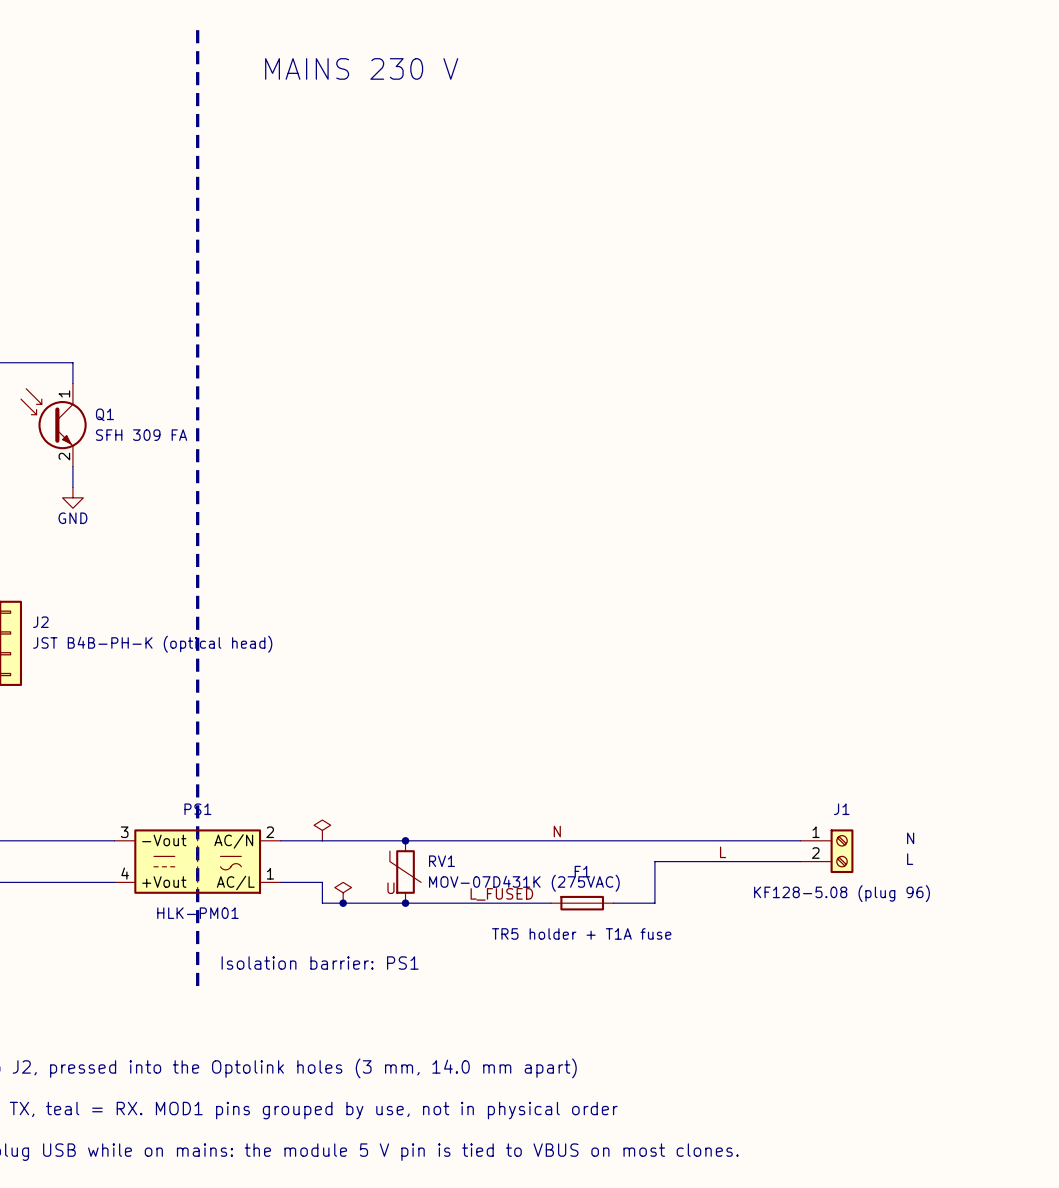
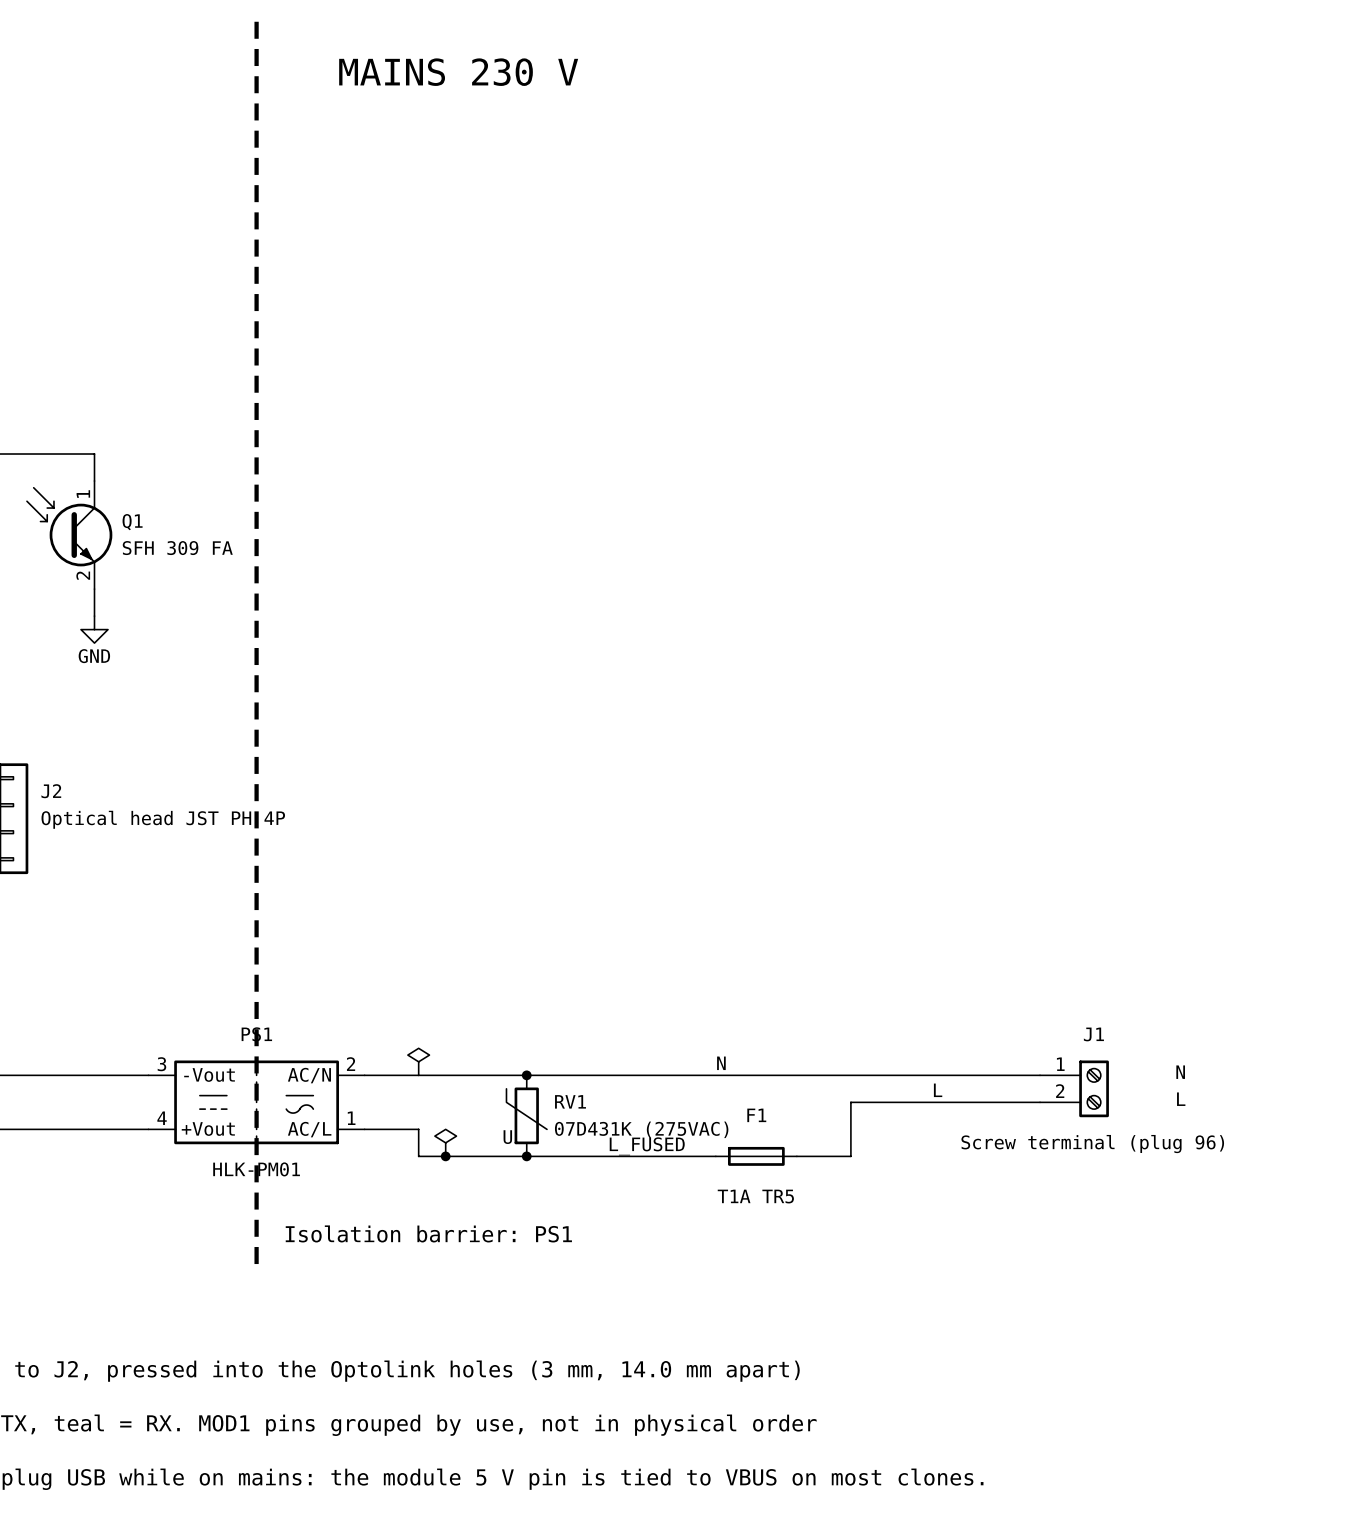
J2 value: JST B4B-PH-K (optical head) (152, 644) -> Optical head JST PH 4P (163, 819)
RV1 value: MOV-07D431K (275VAC) (524, 883) -> 07D431K (275VAC) (641, 1129)
J1 value: KF128-5.08 (plug 96) (842, 893) -> Screw terminal (plug 96) (1092, 1144)
F1 value: TR5 holder + T1A fuse (581, 933) -> T1A TR5 (755, 1196)

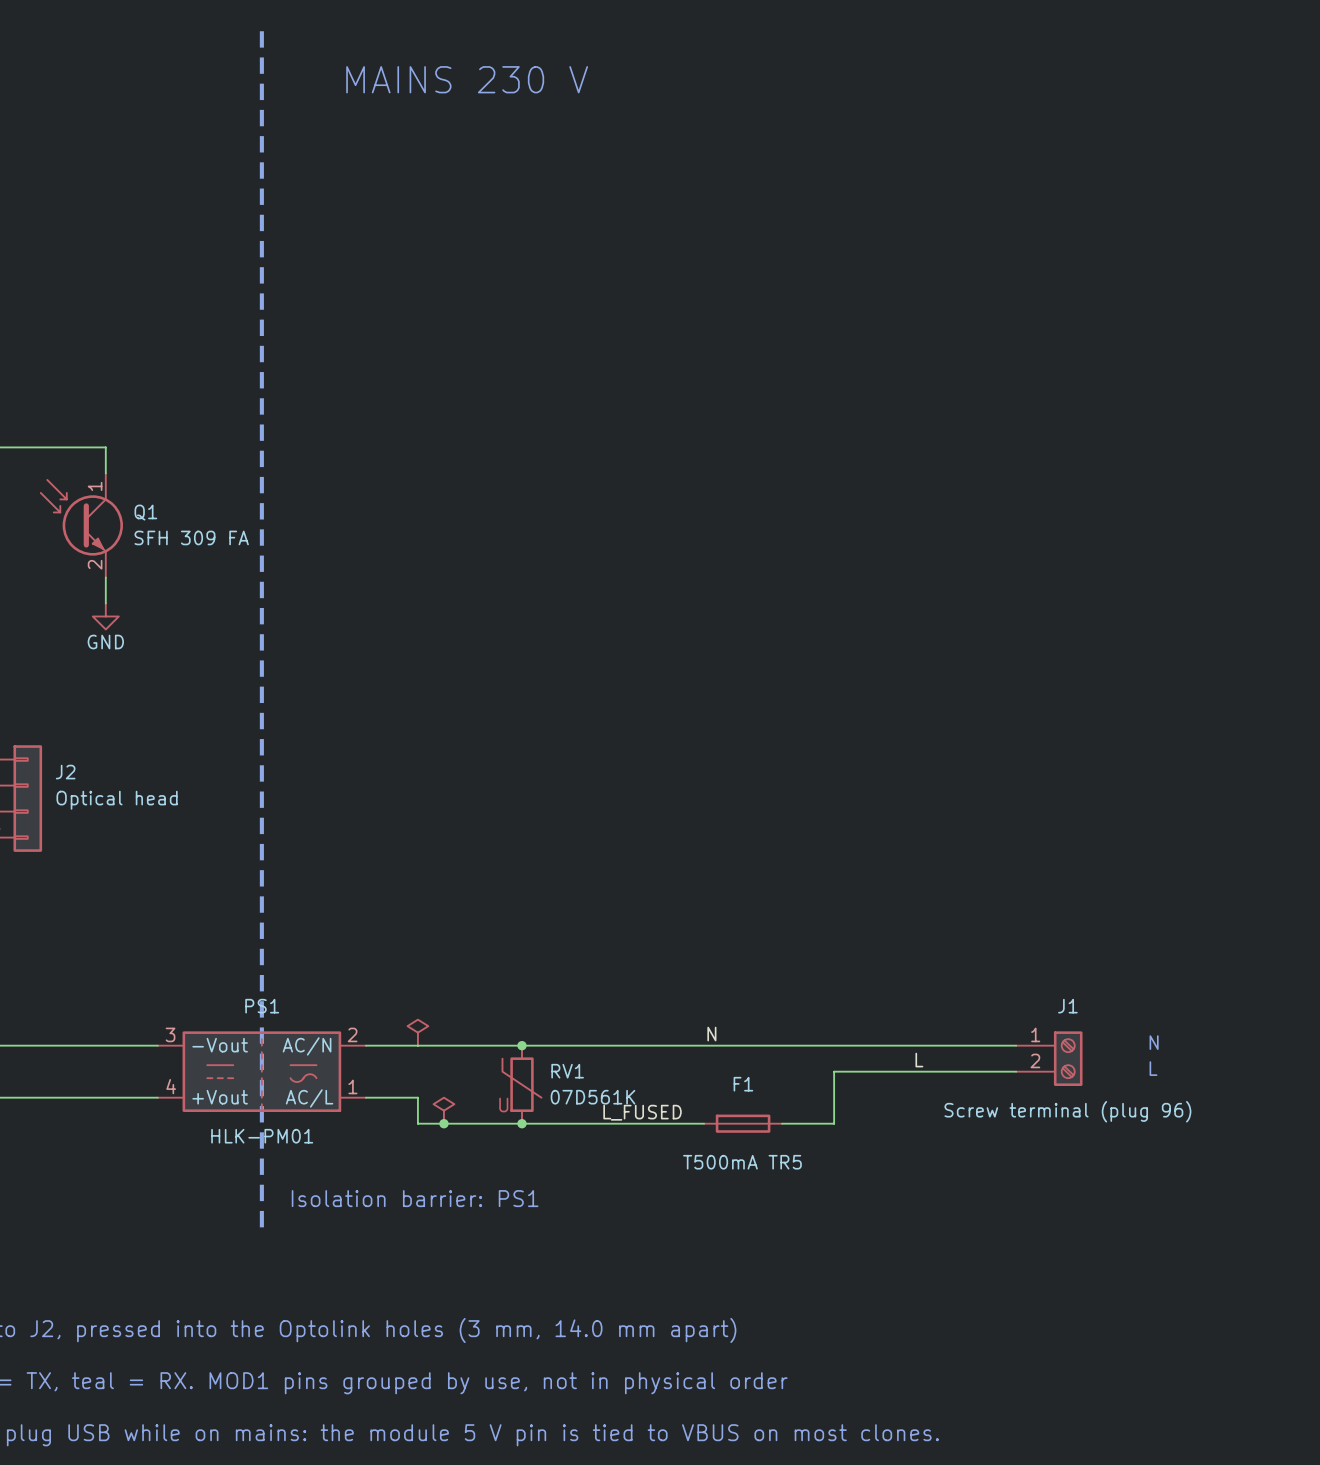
J2 value: Optical head JST PH 4P (163, 819) -> Optical head (117, 800)
RV1 value: 07D431K (275VAC) (641, 1129) -> 07D561K (593, 1097)
F1 value: T1A TR5 (755, 1196) -> T500mA TR5 (742, 1162)

